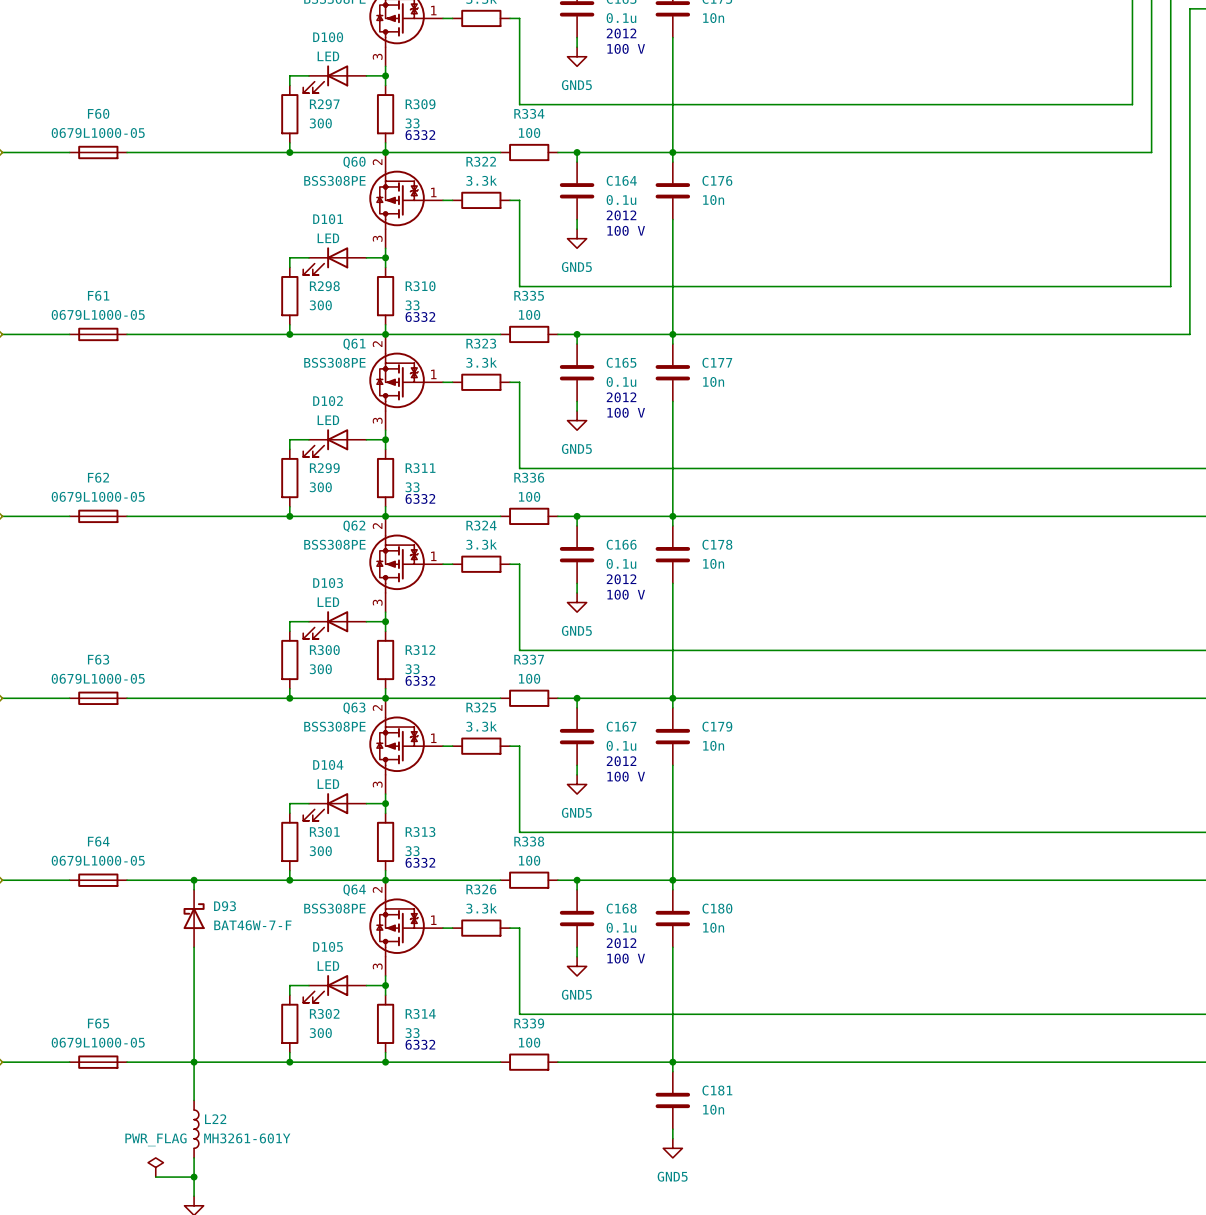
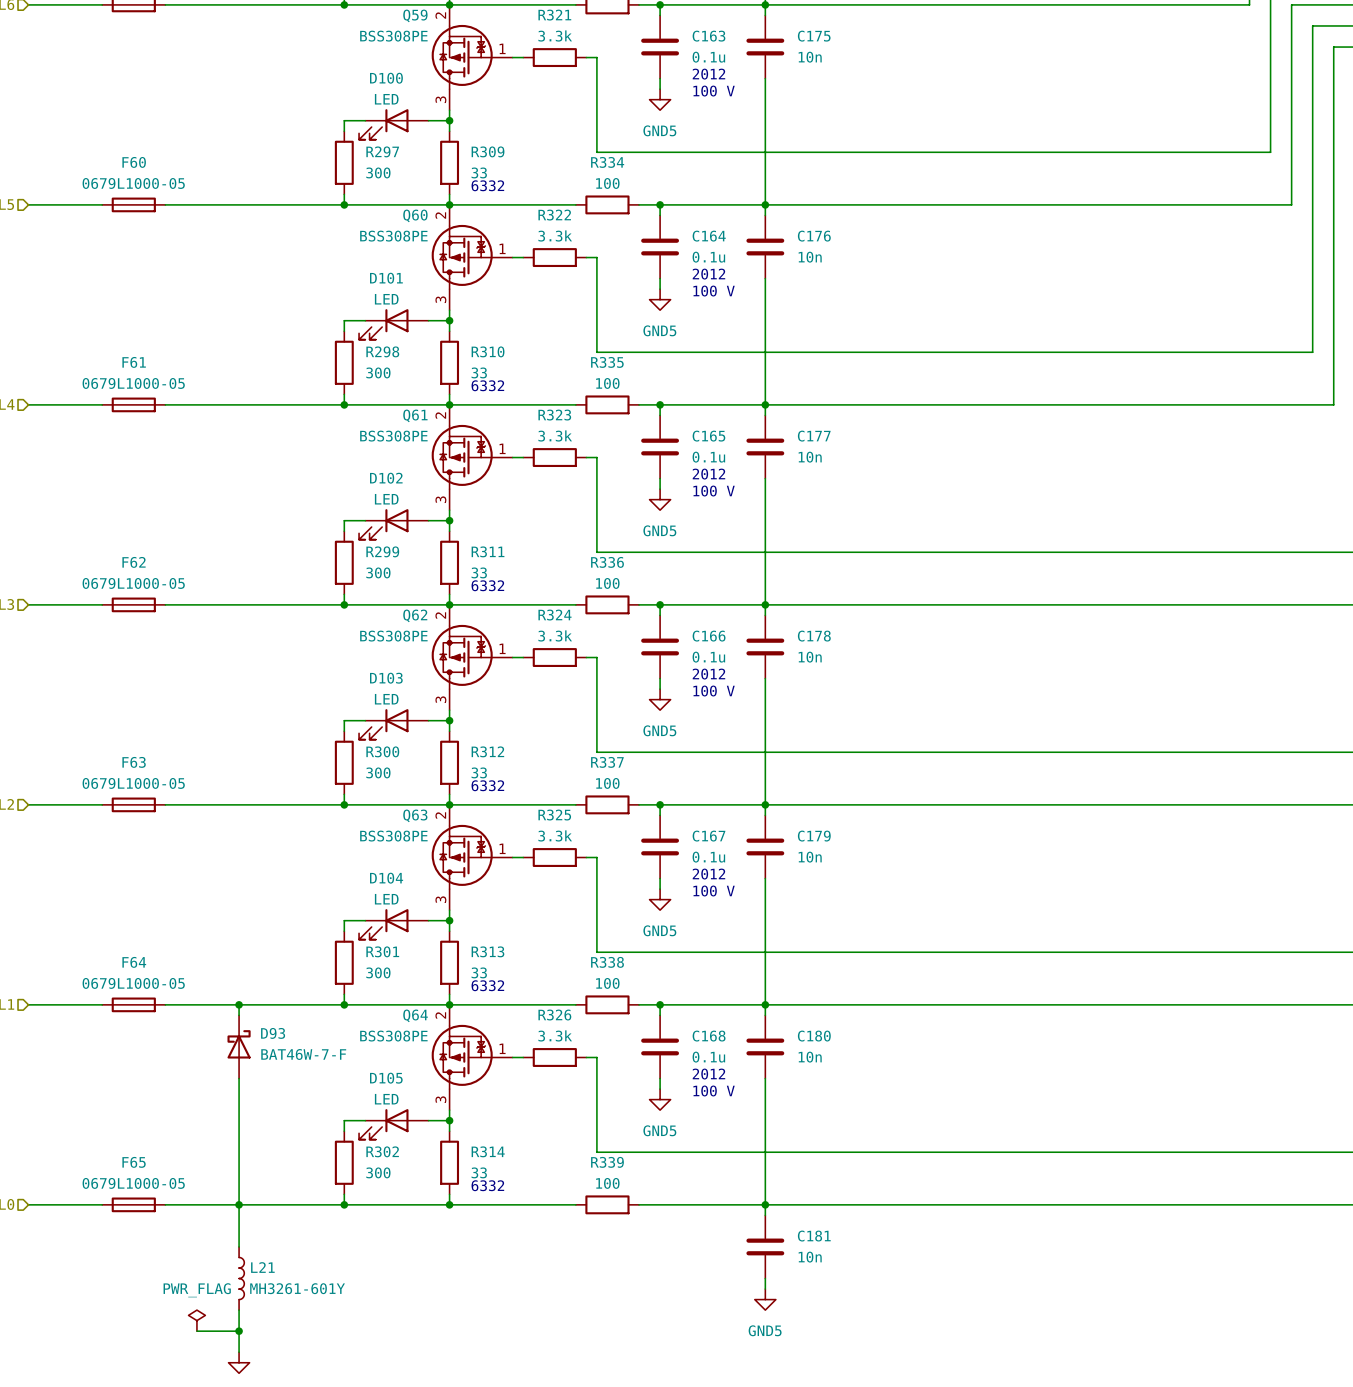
L22 name: L22 (215, 1119) -> L21 (262, 1267)

